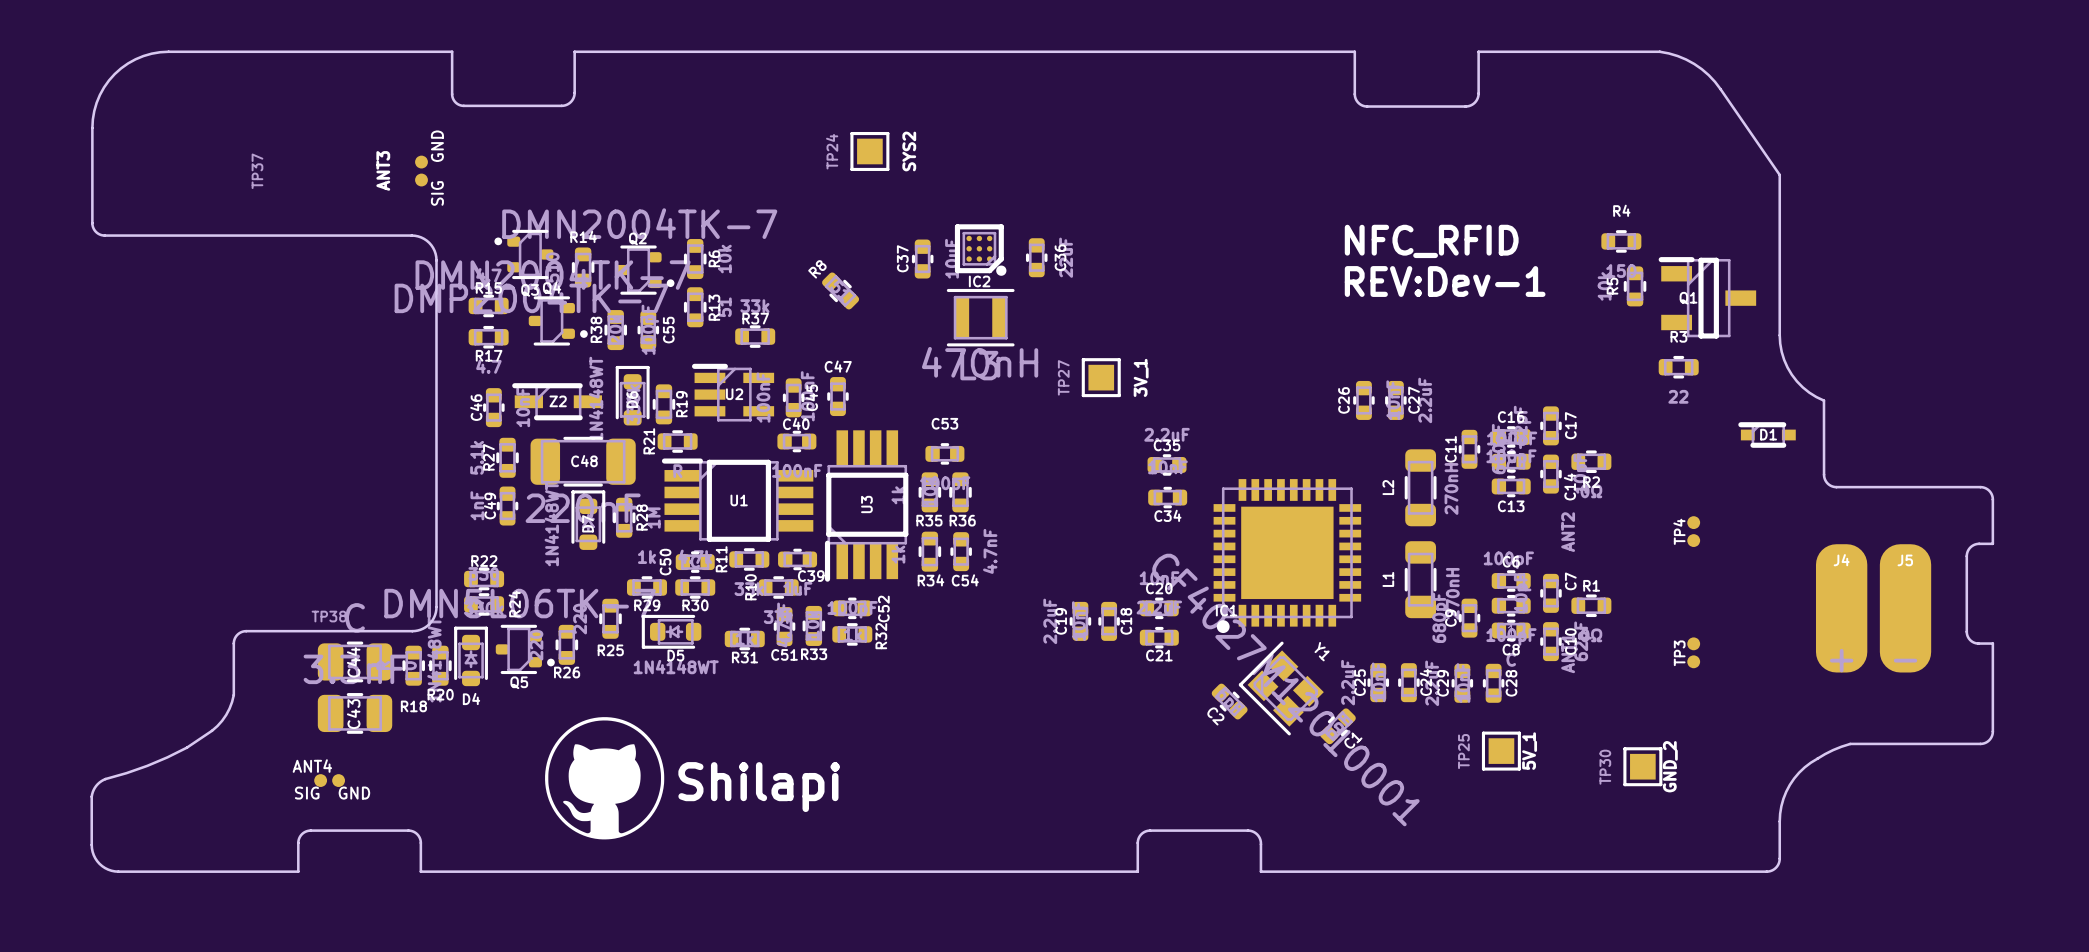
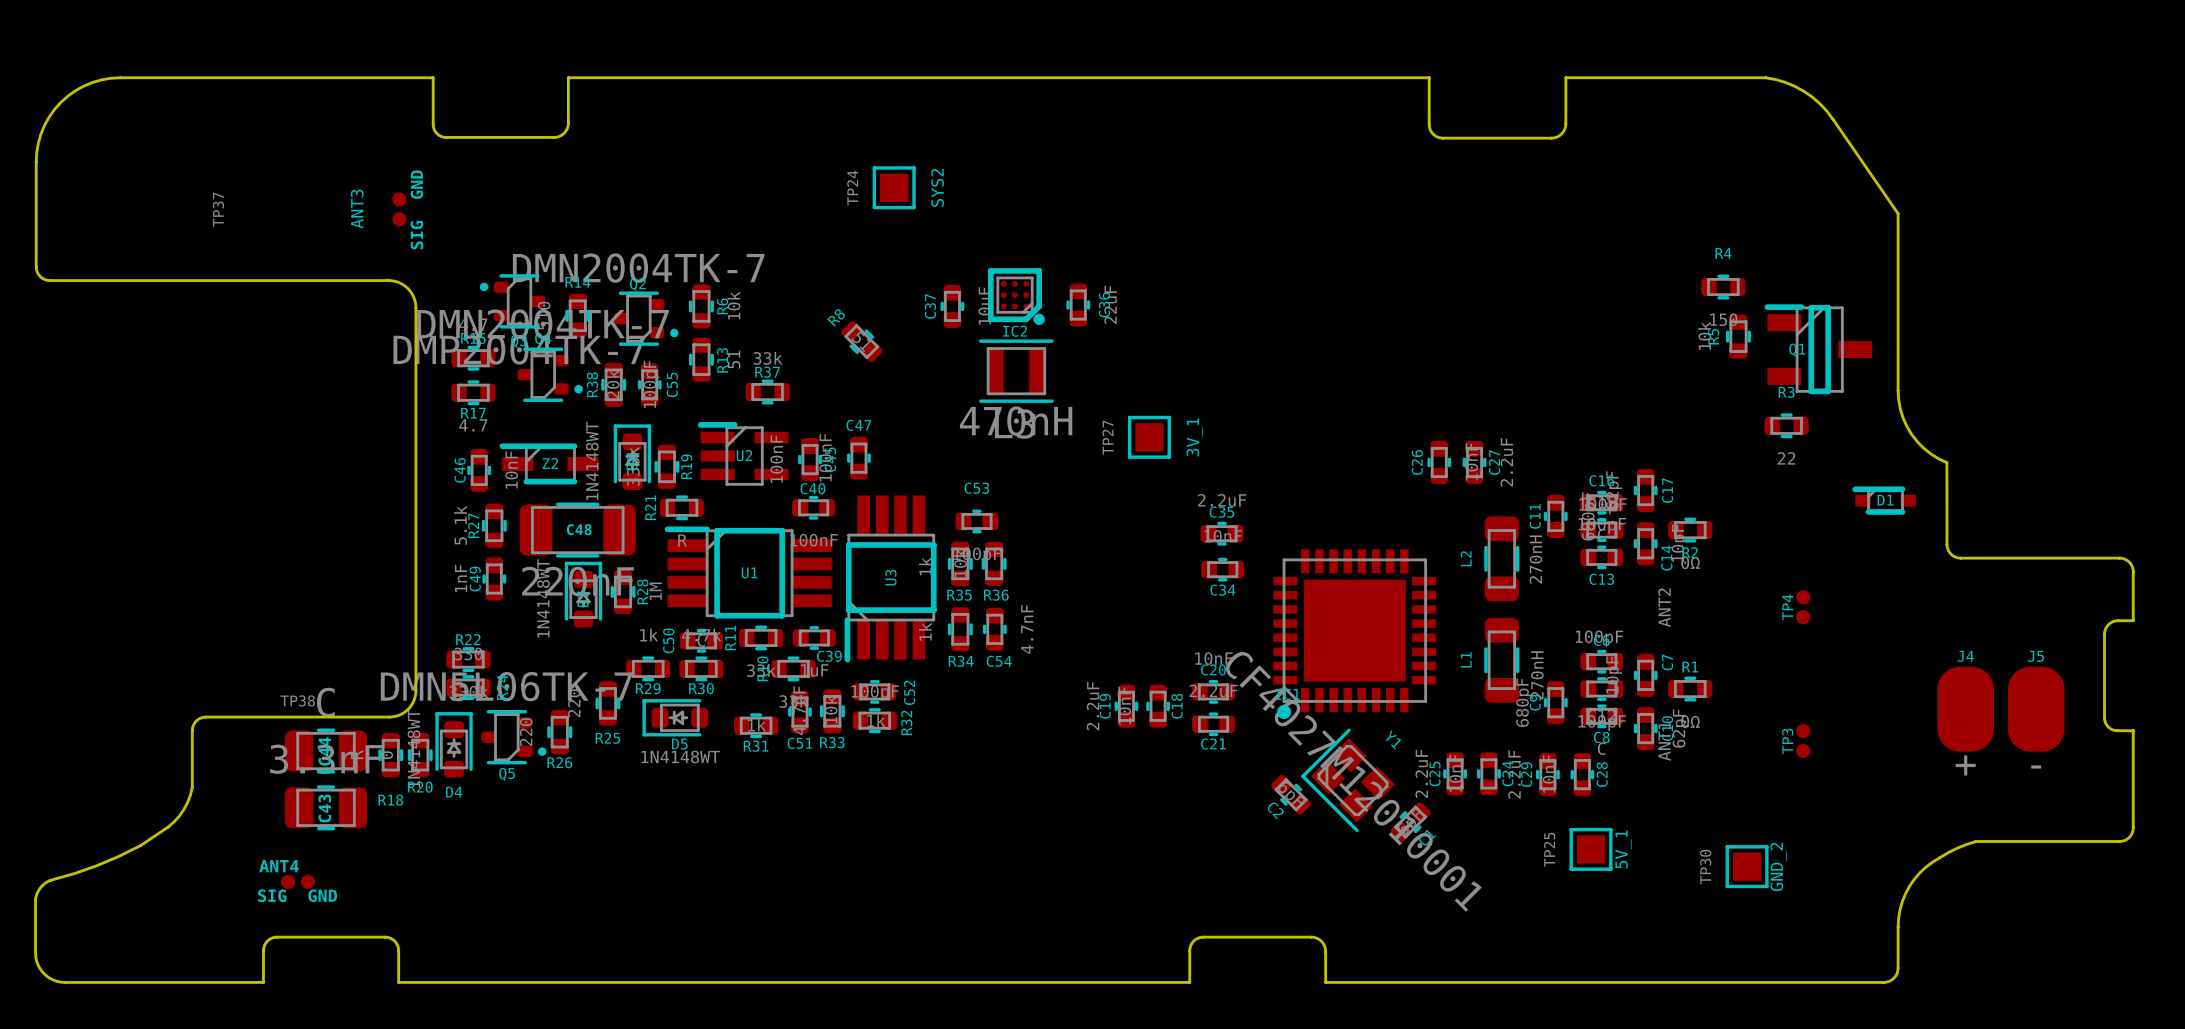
text: NFC_RFID (1431, 241) -> none
text: REV:Dev-1 (1445, 281) -> none
J4 footprint: [1815, 544, 1868, 673] -> [1937, 666, 1995, 752]
J5 footprint: [1879, 544, 1932, 673] -> [2007, 666, 2065, 752]
drawing: [545, 717, 665, 840] -> none
text: Shilapi (759, 787) -> none

